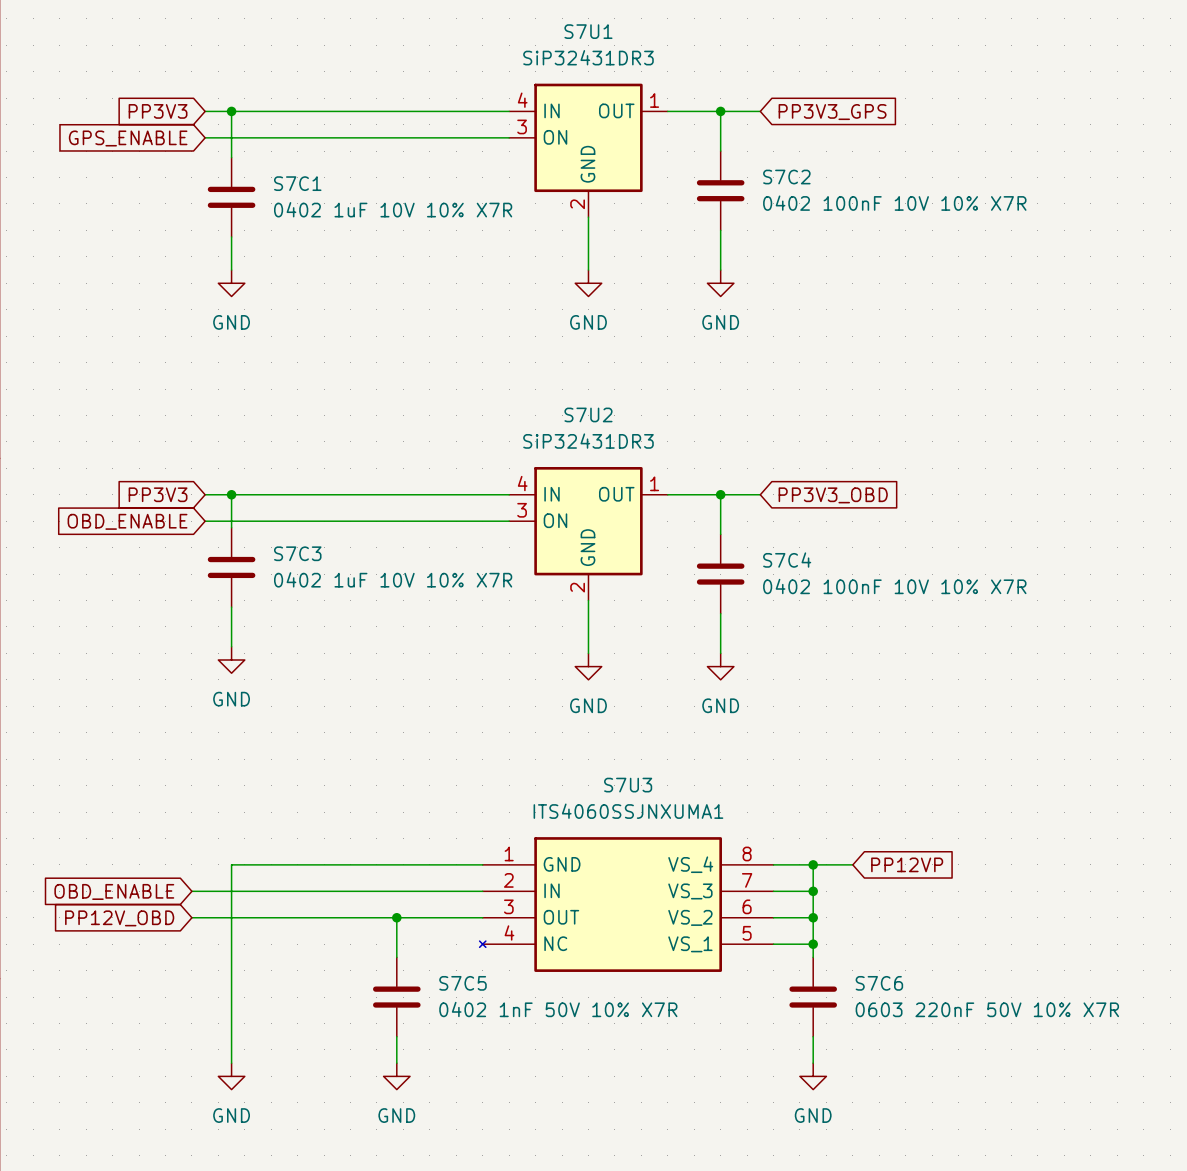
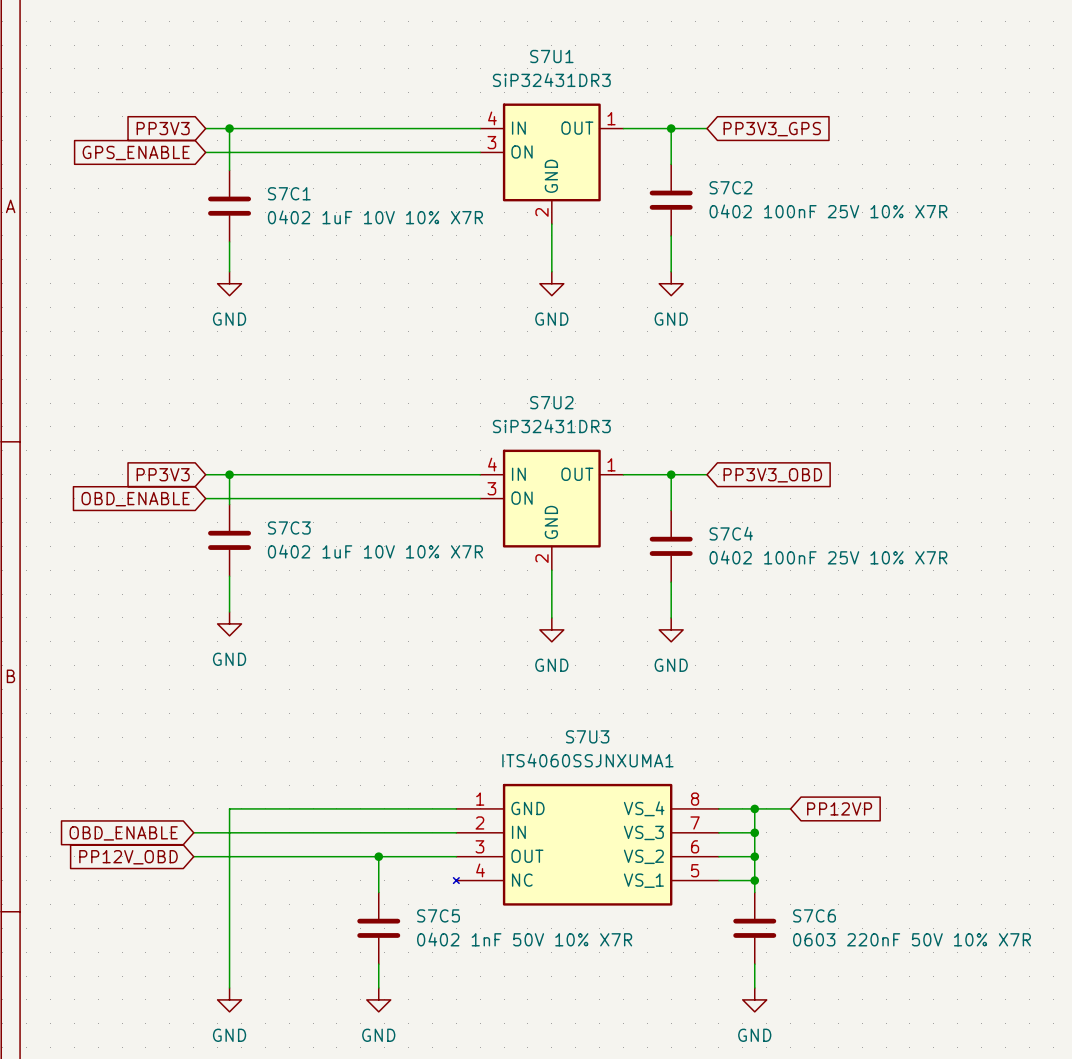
S7C2 value: 0402 100nF 10V 10% X7R (894, 203) -> 0402 100nF 25V 10% X7R (828, 211)
S7C4 value: 0402 100nF 10V 10% X7R (894, 586) -> 0402 100nF 25V 10% X7R (828, 557)

